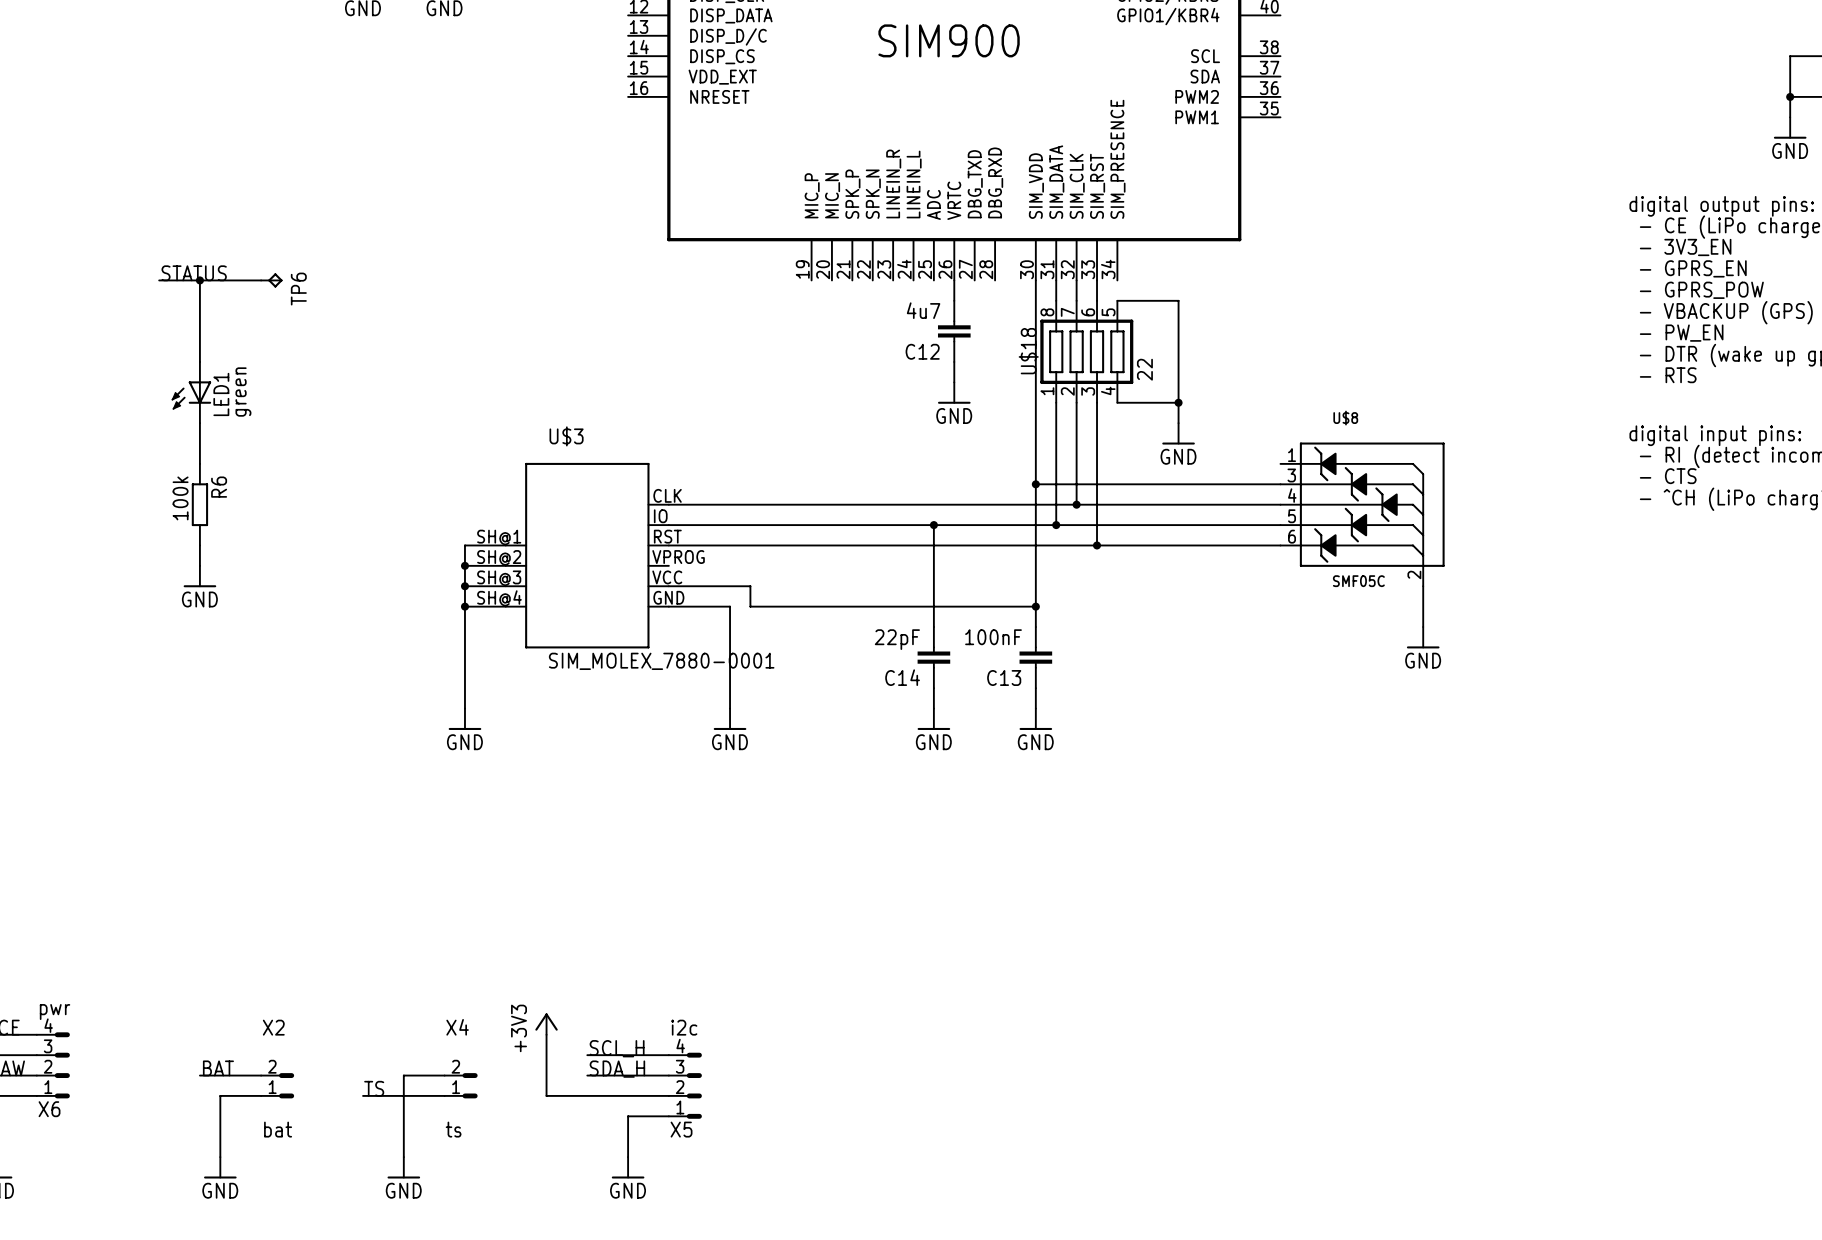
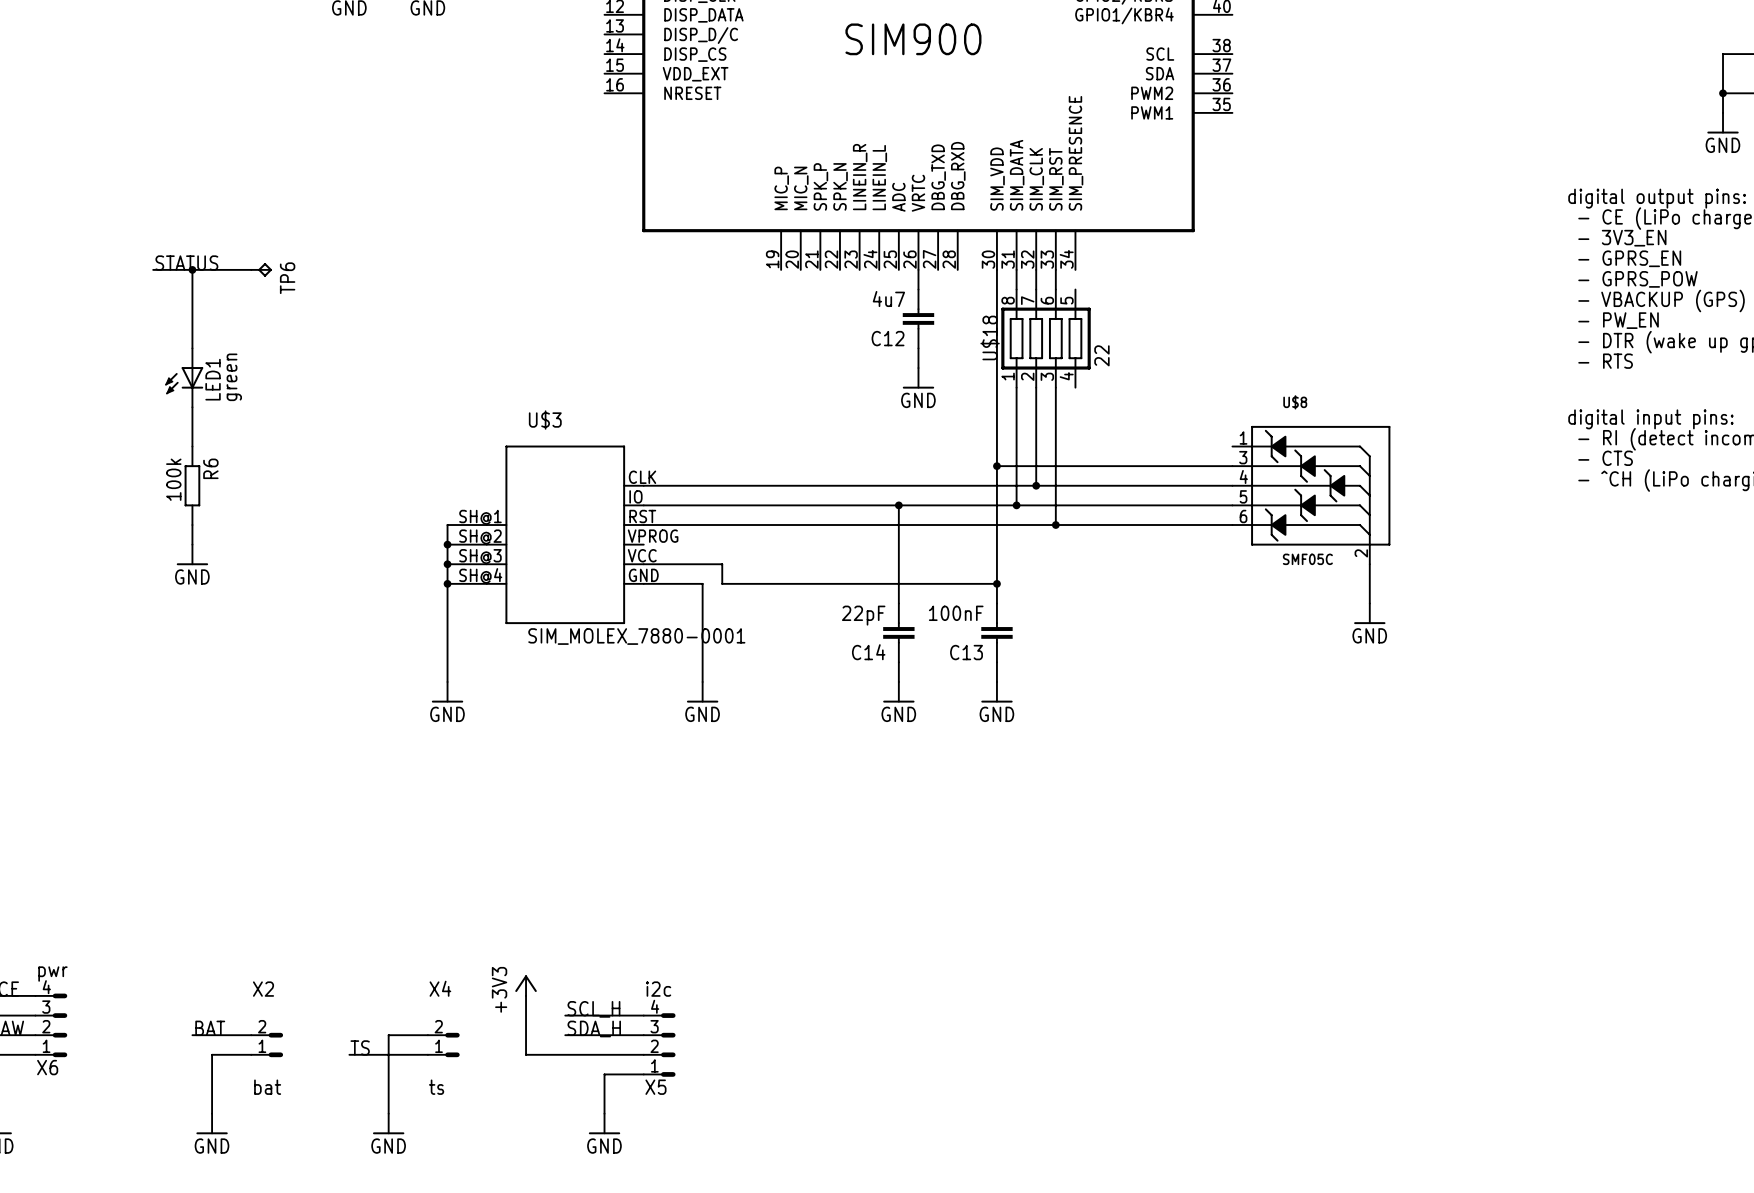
wire: (1117, 300) (1178, 300) (1178, 423) -> none
wire: (1117, 402) (1178, 402) -> none
junction: (1178, 402) -> none
power symbol: GND (1178, 433) -> none

